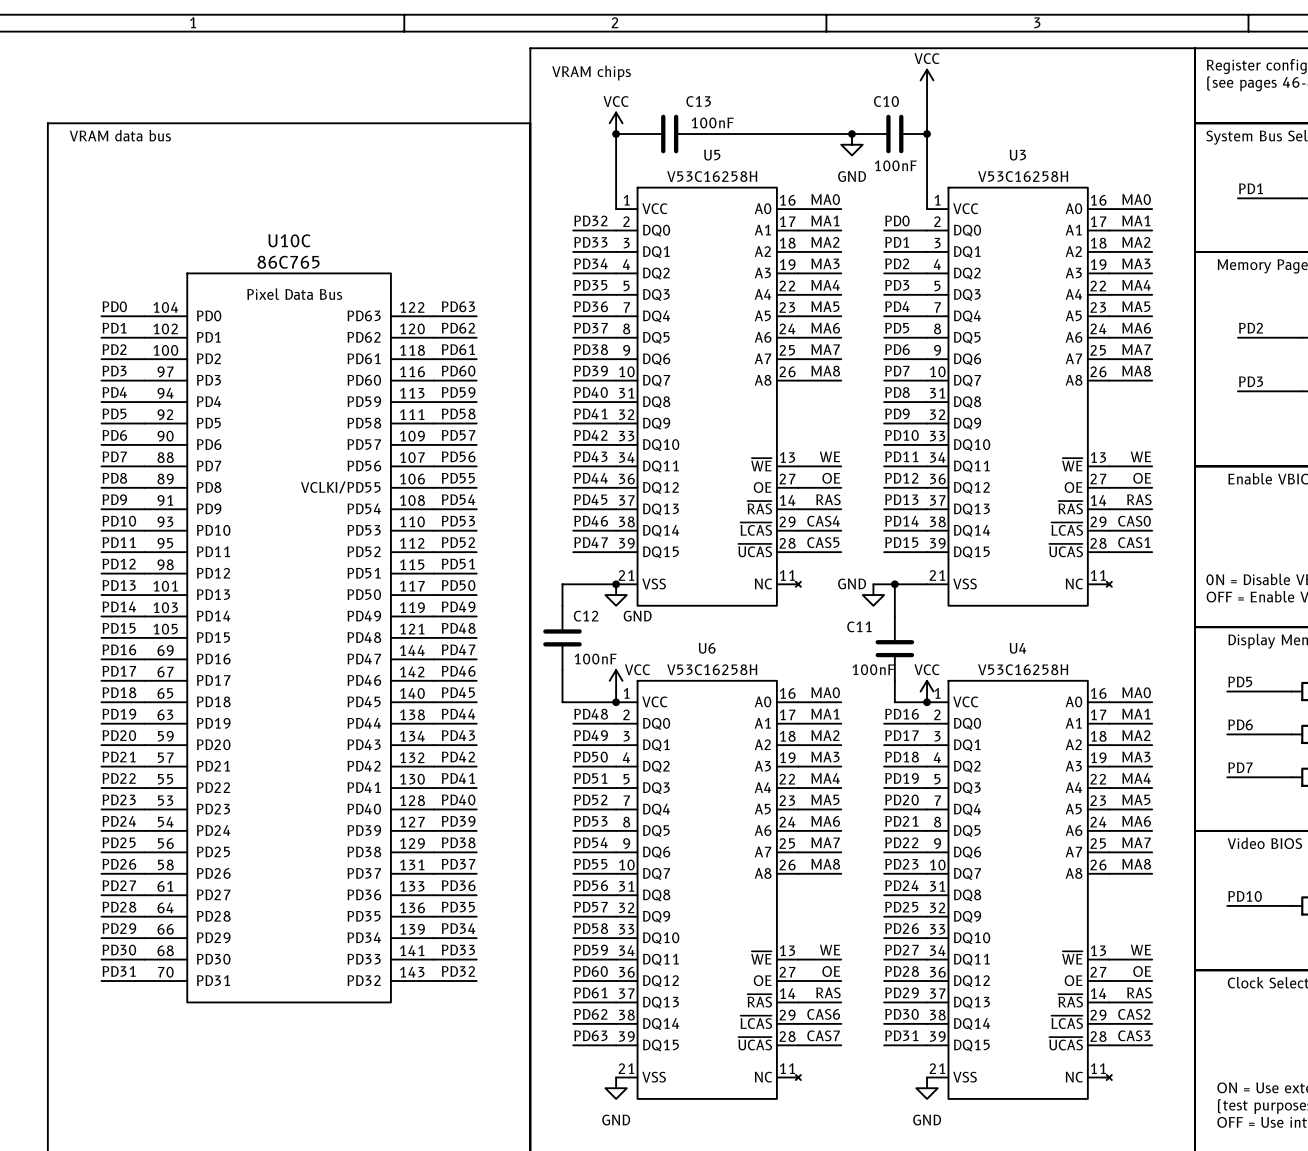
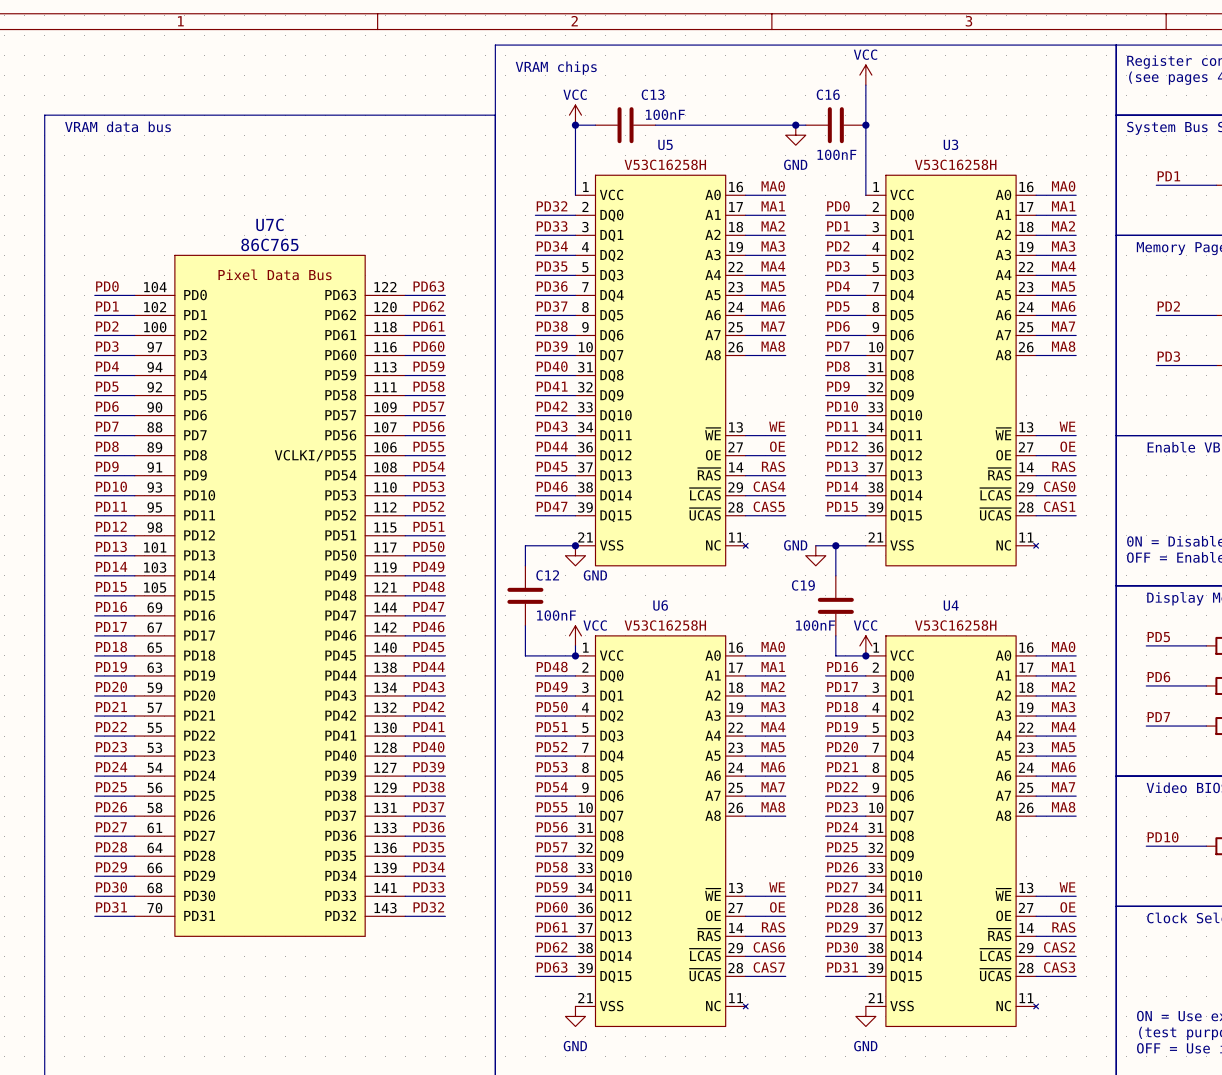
C10 name: C10 (886, 101) -> C16 (828, 94)
U10C name: U10C (289, 240) -> U7C (269, 224)
C11 name: C11 (859, 626) -> C19 (803, 585)

